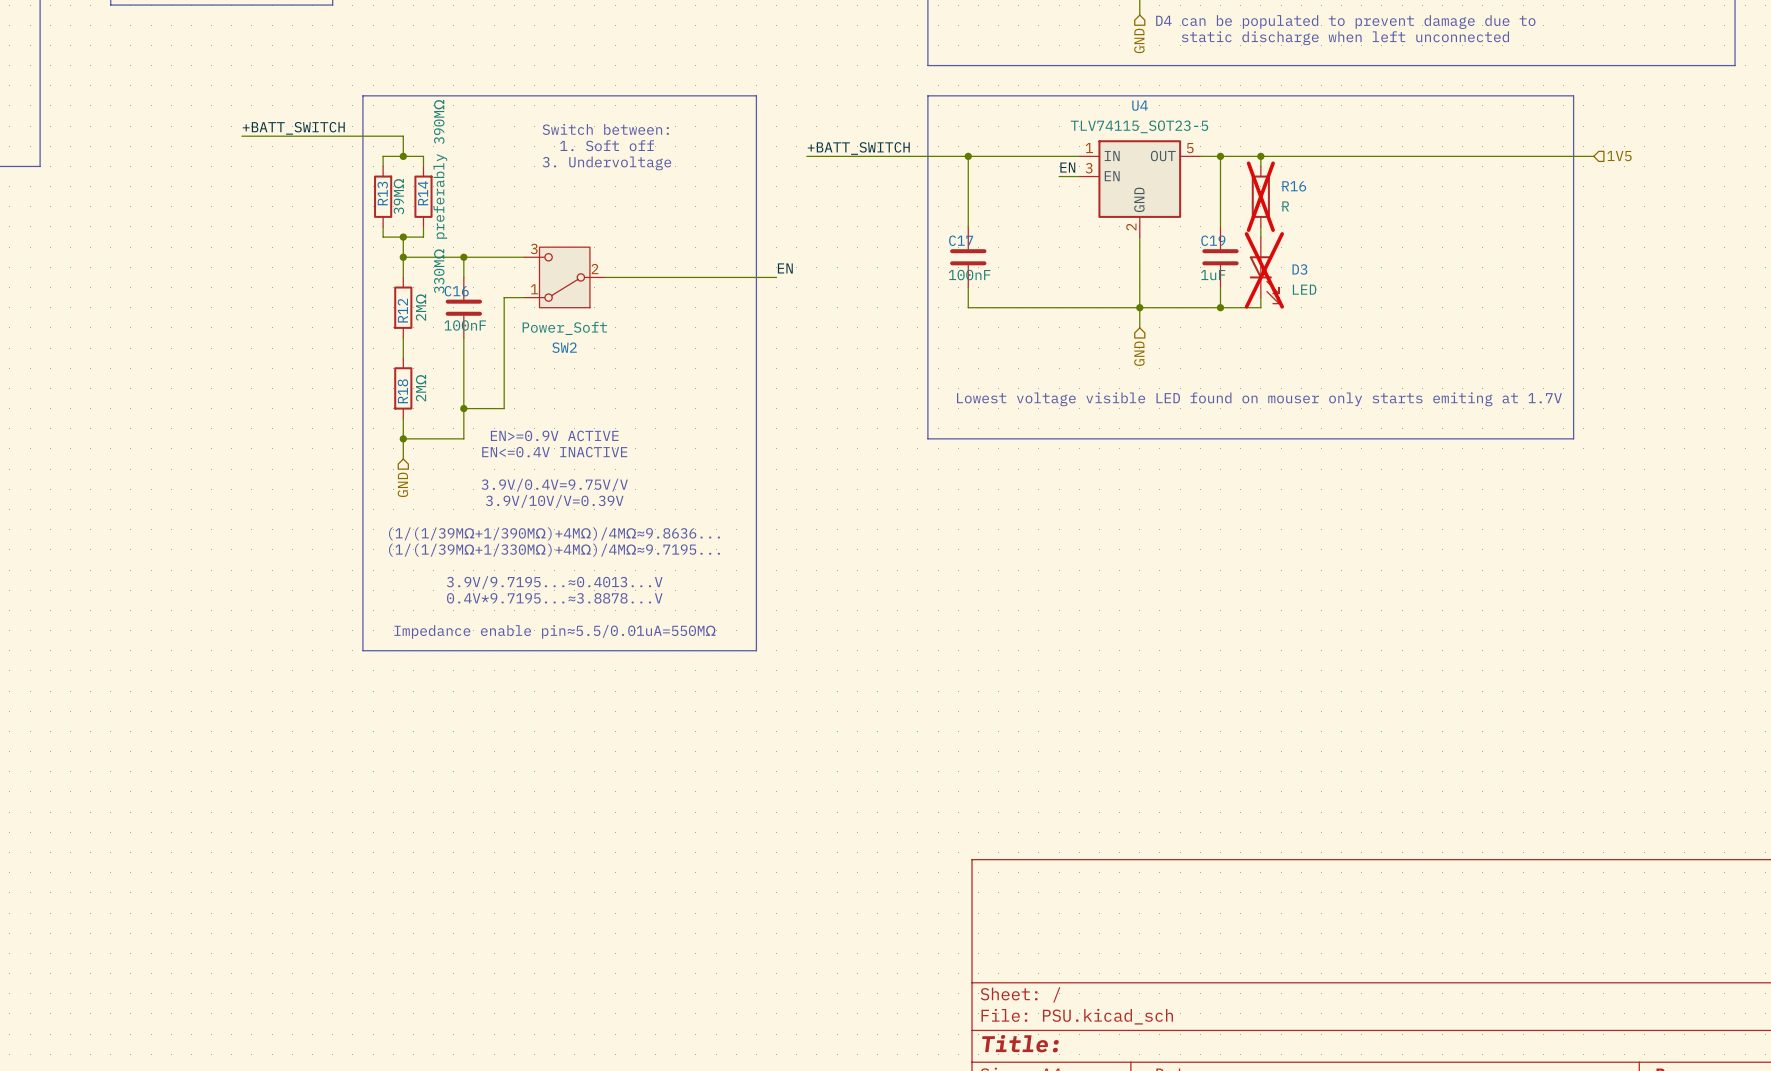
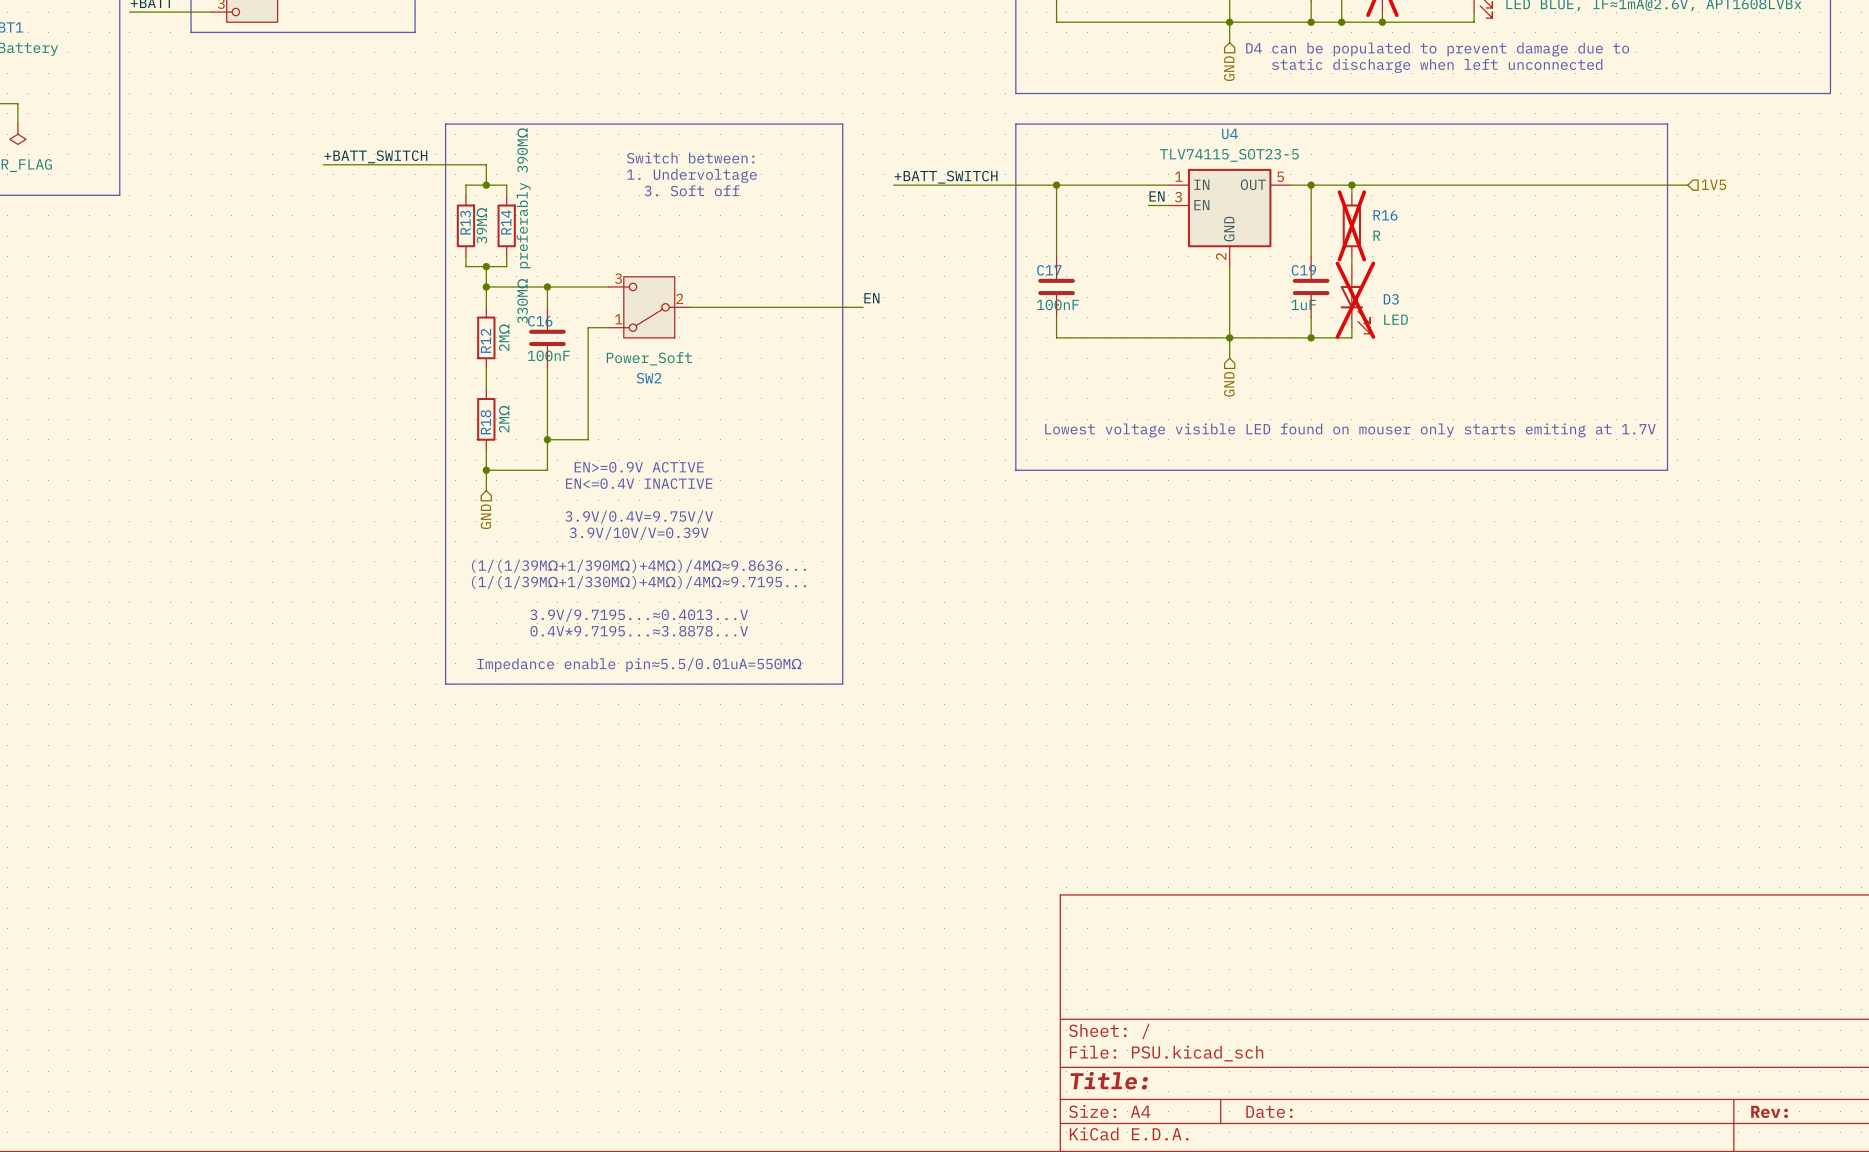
text: 1. Soft off (607, 145) -> 1. Undervoltage (691, 175)
text: 3. Undervoltage (606, 163) -> 3. Soft off (691, 190)

